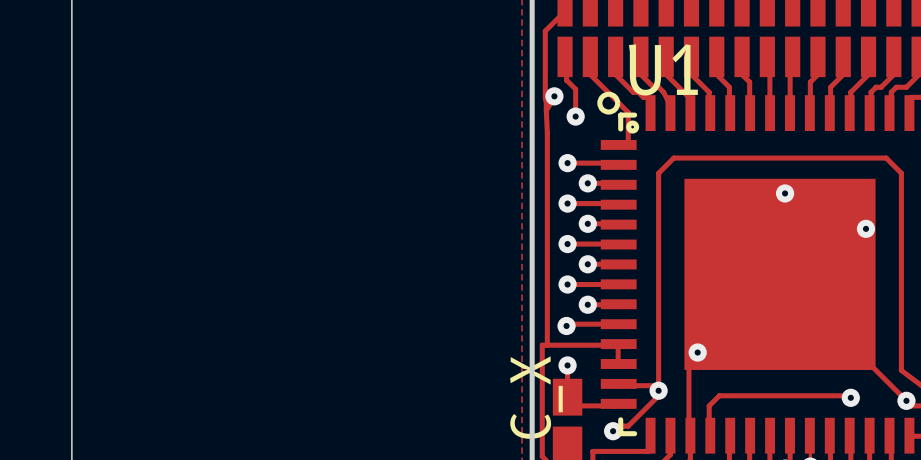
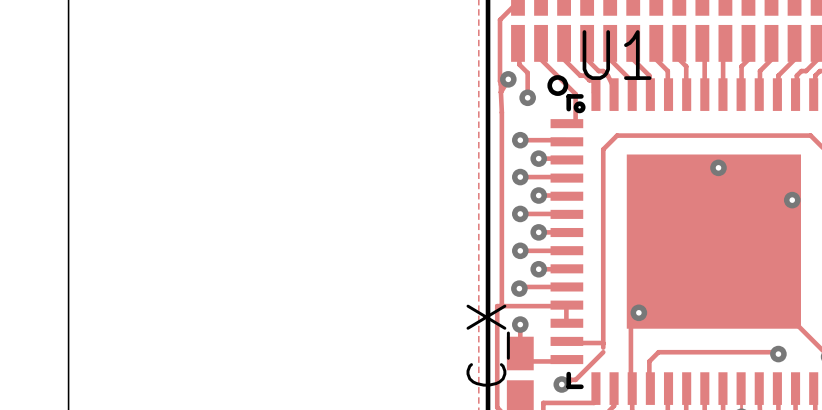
via: (658, 390) -> none

